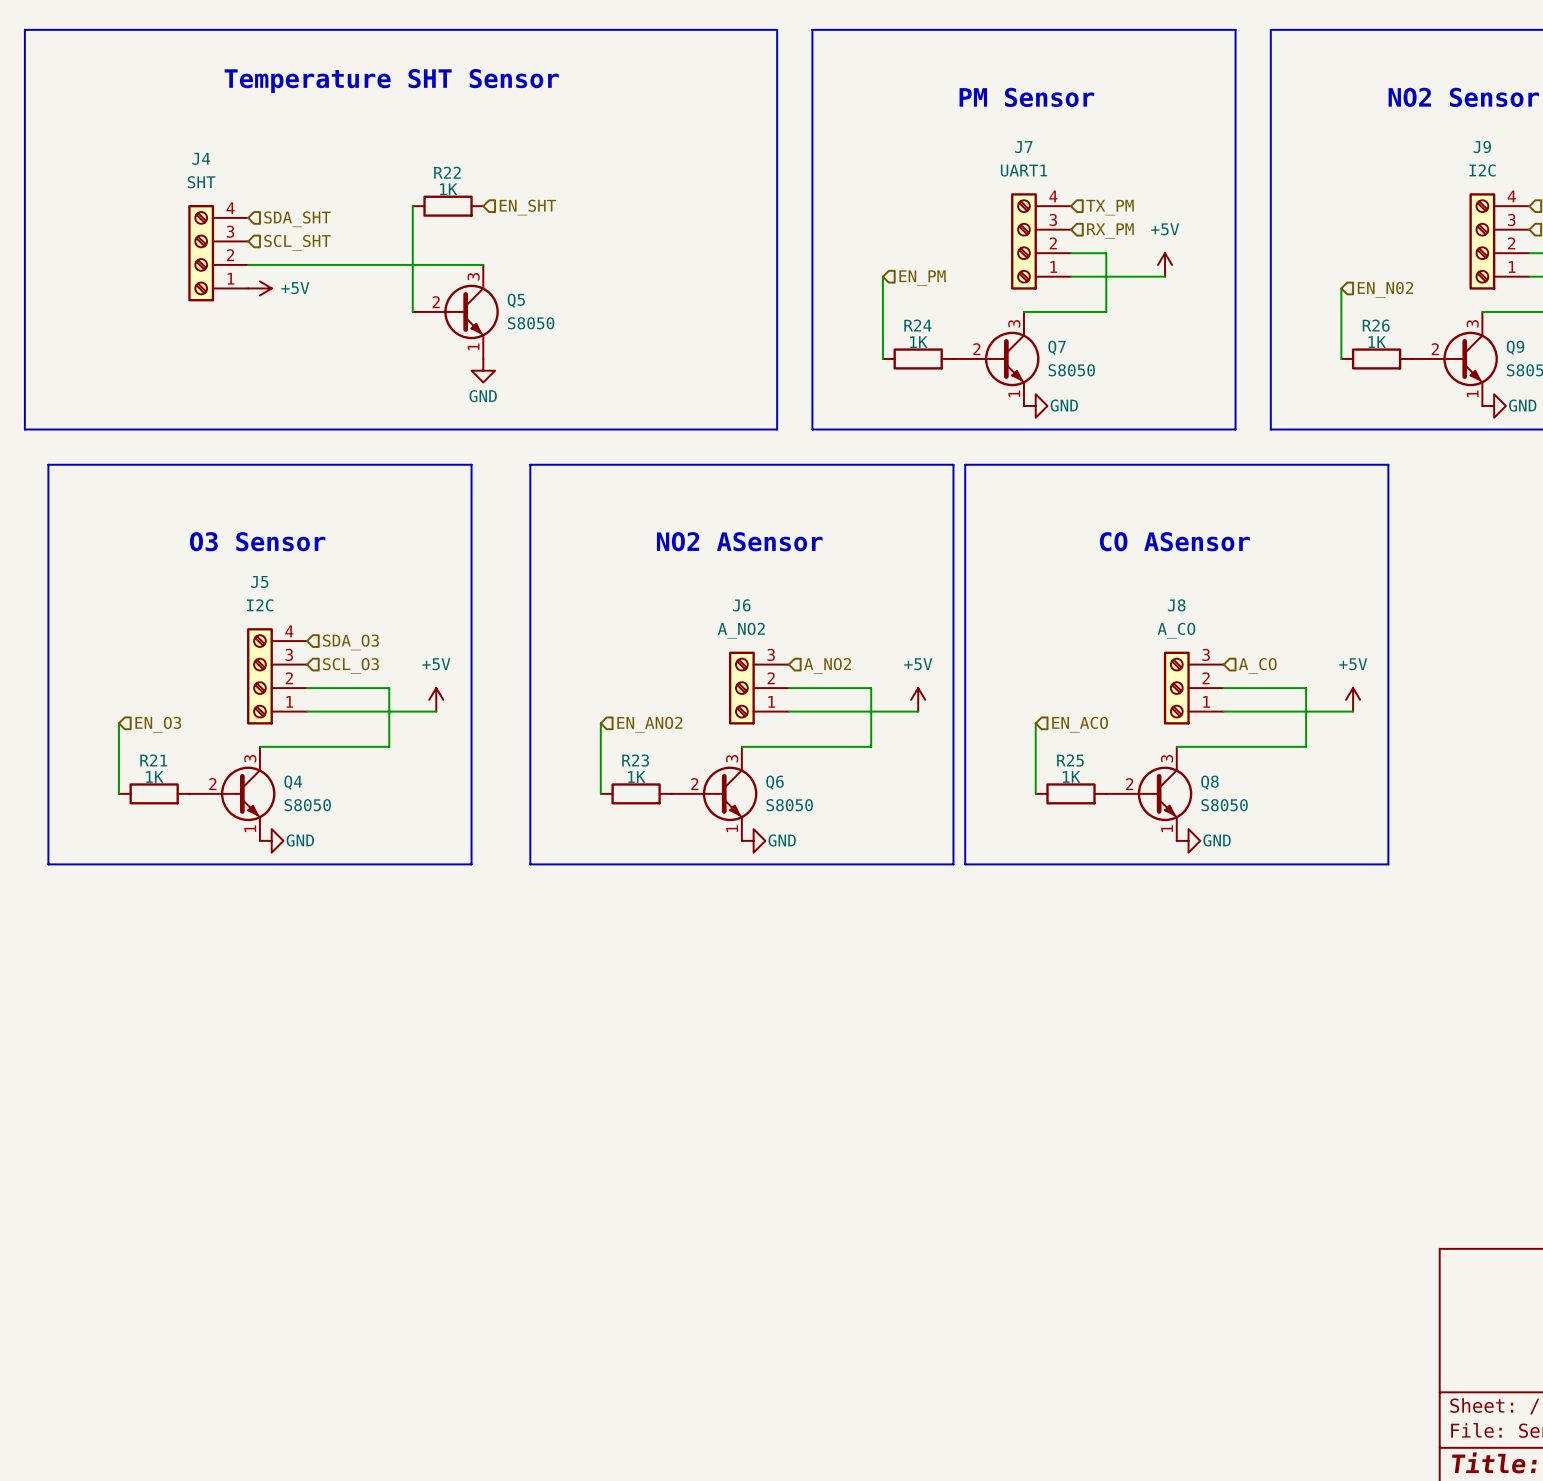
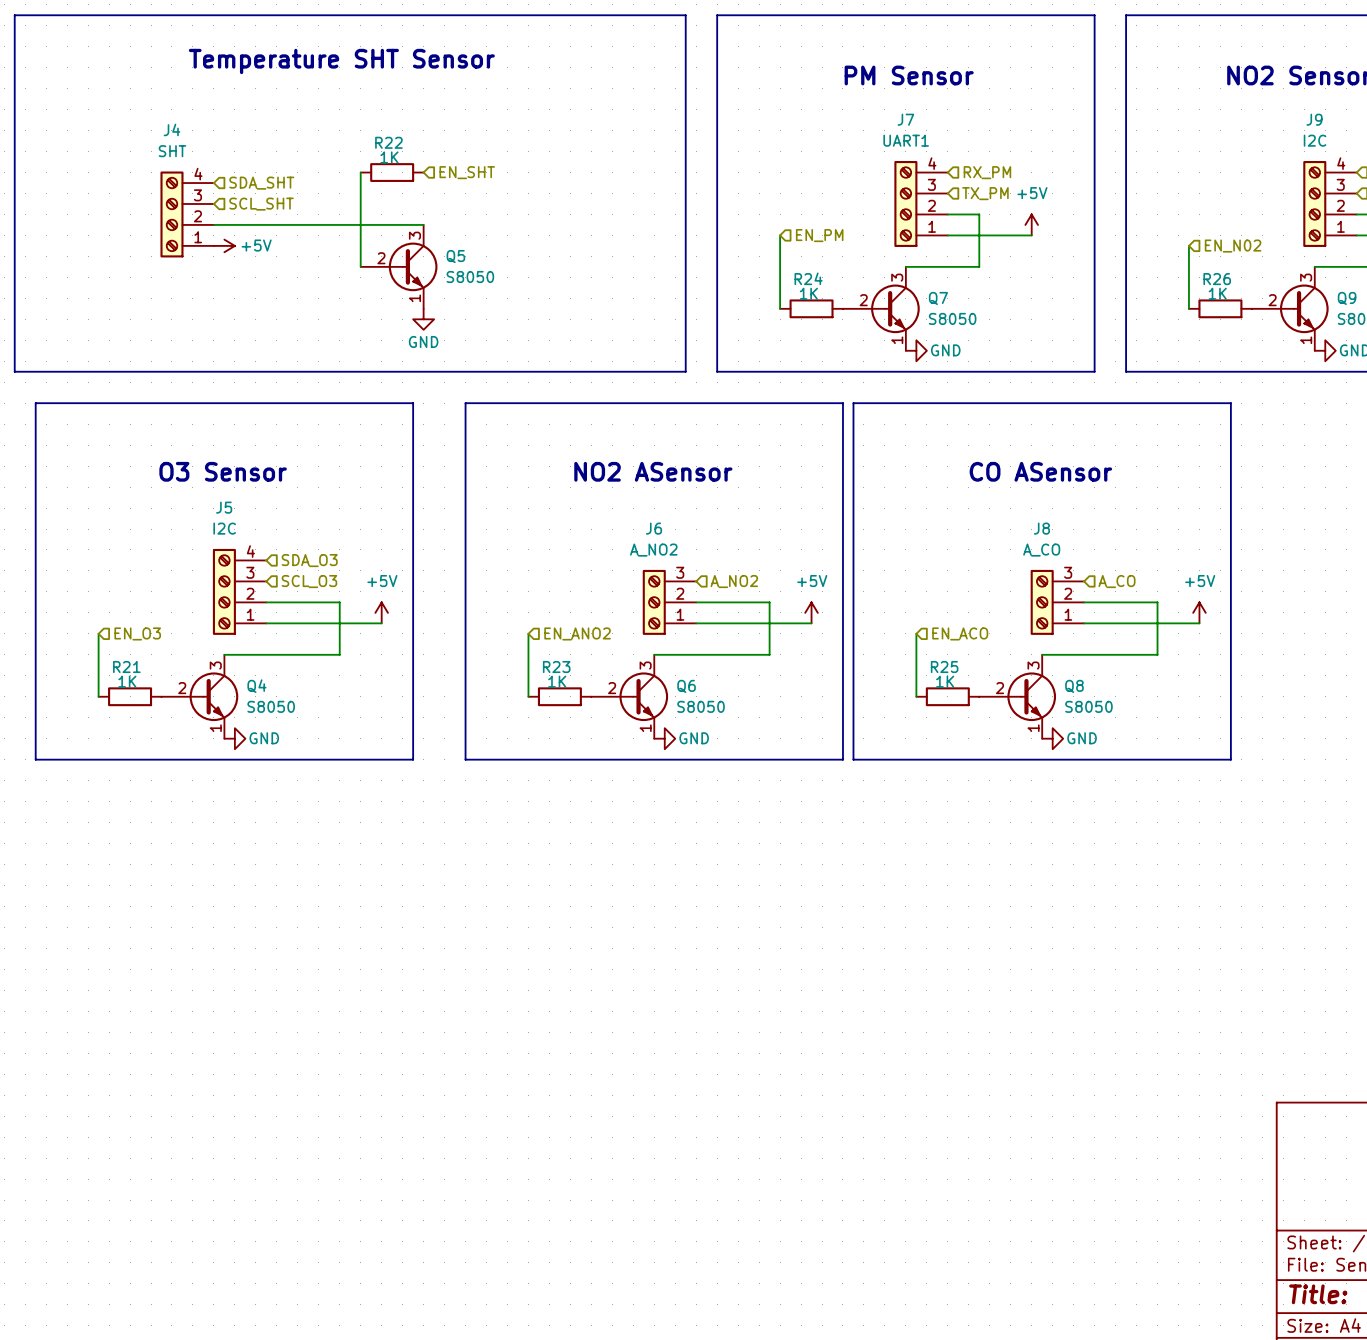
hierarchical label: TX_PM (1110, 207) -> RX_PM (987, 172)
hierarchical label: RX_PM (1110, 231) -> TX_PM (985, 193)

